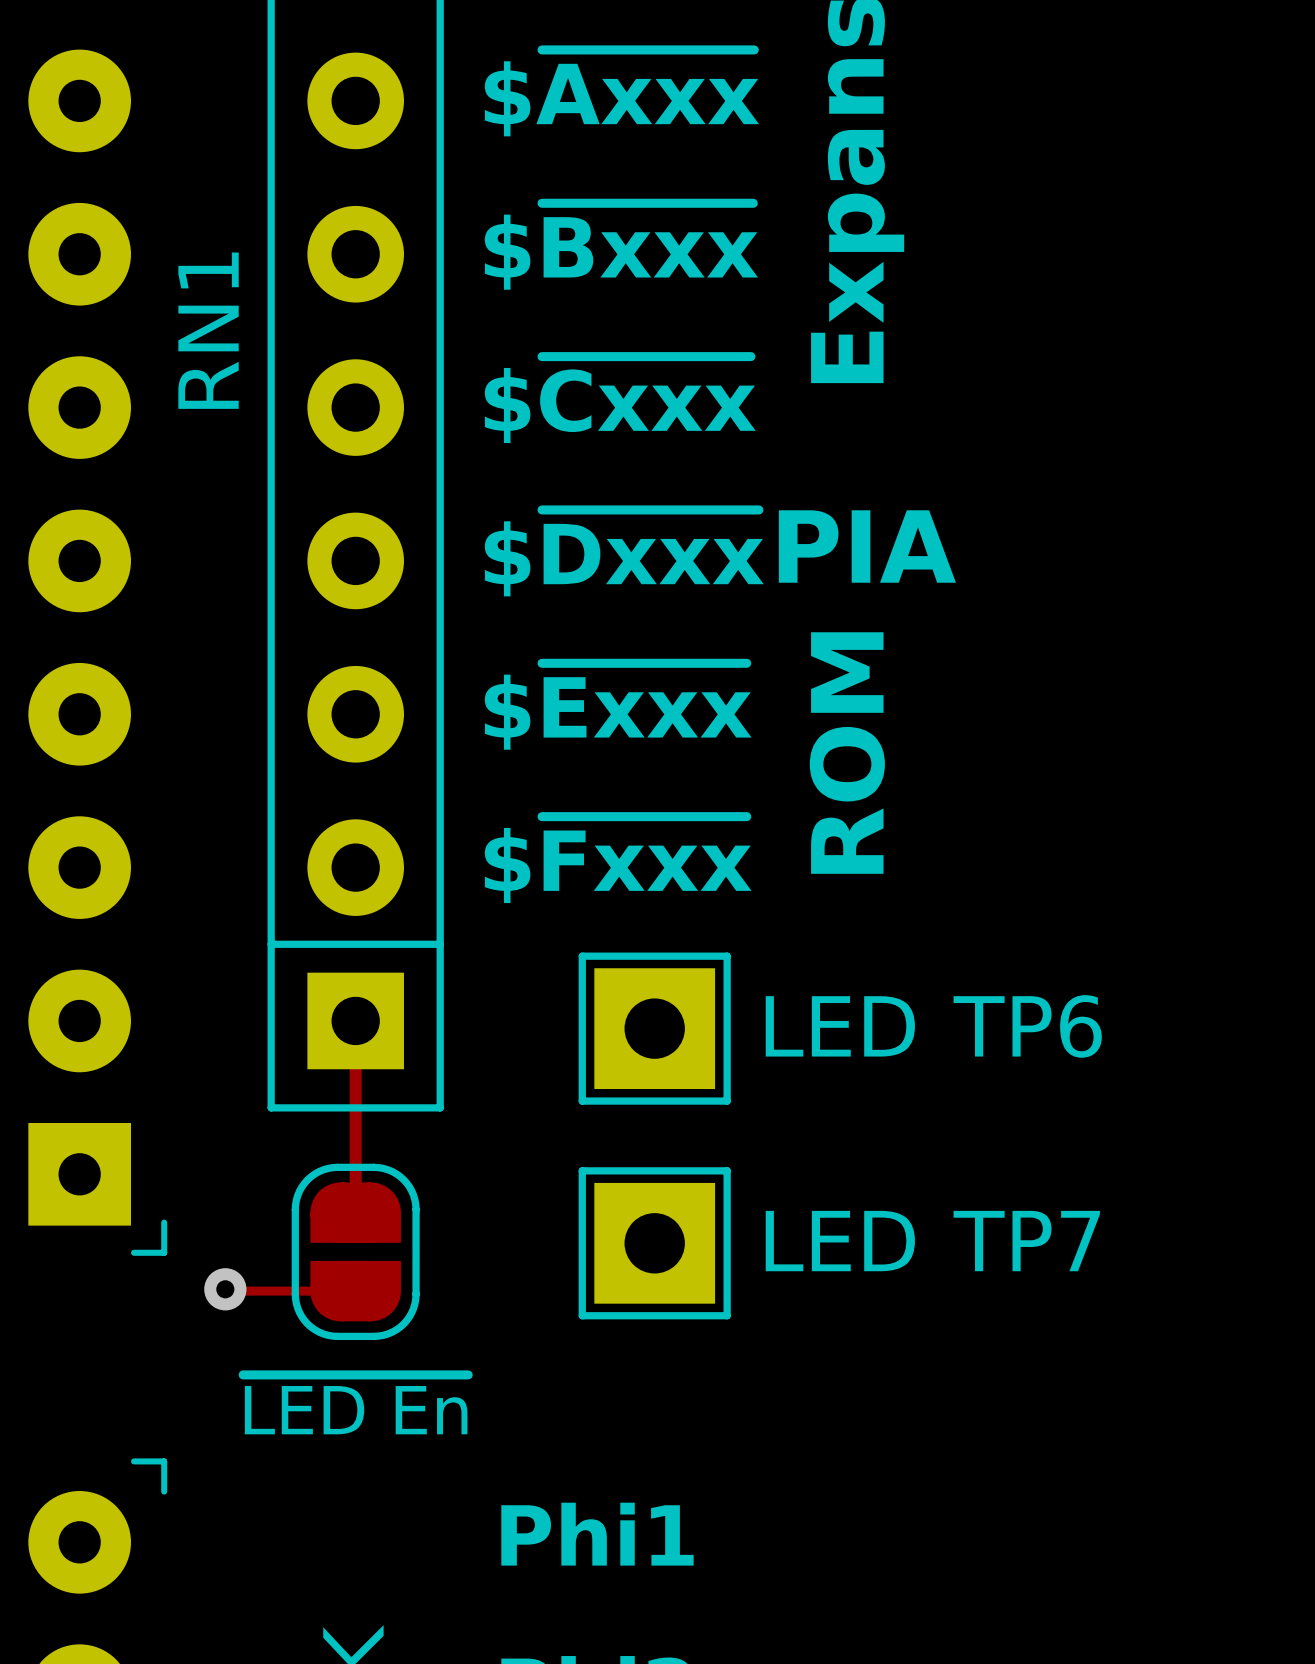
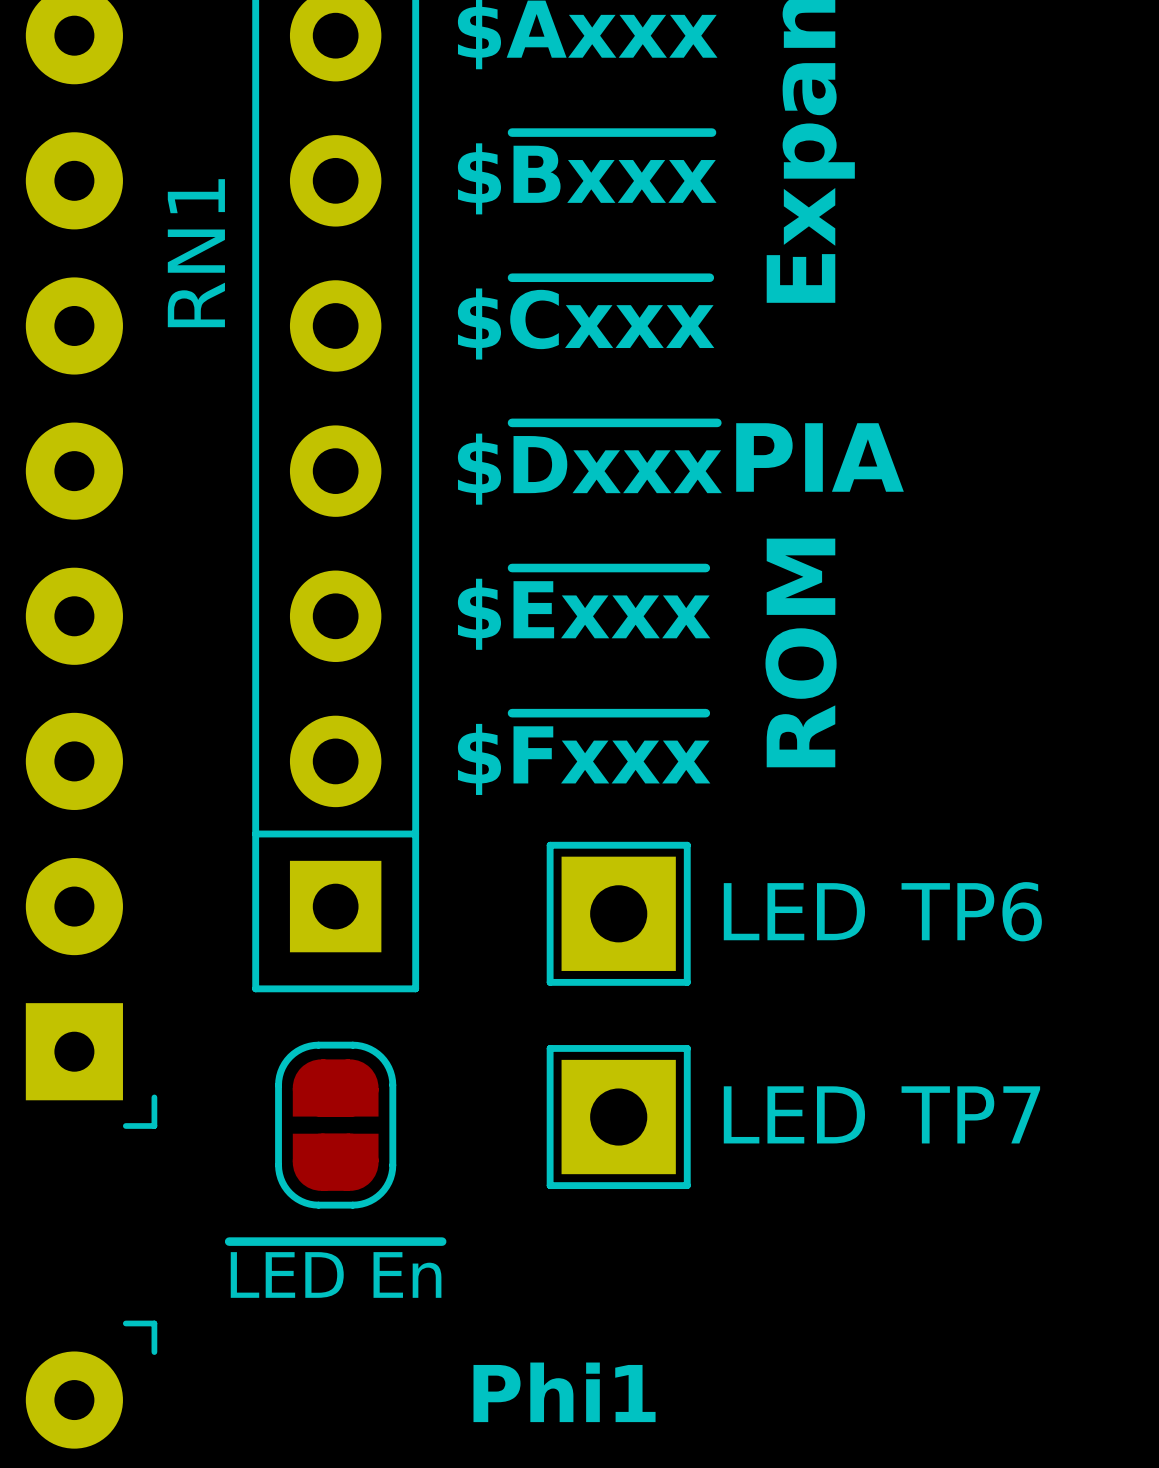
track: (355, 1020) (355, 1212) -> none
track: (225, 1289) (227, 1291) (355, 1291) -> none
via: (225, 1289) -> none

